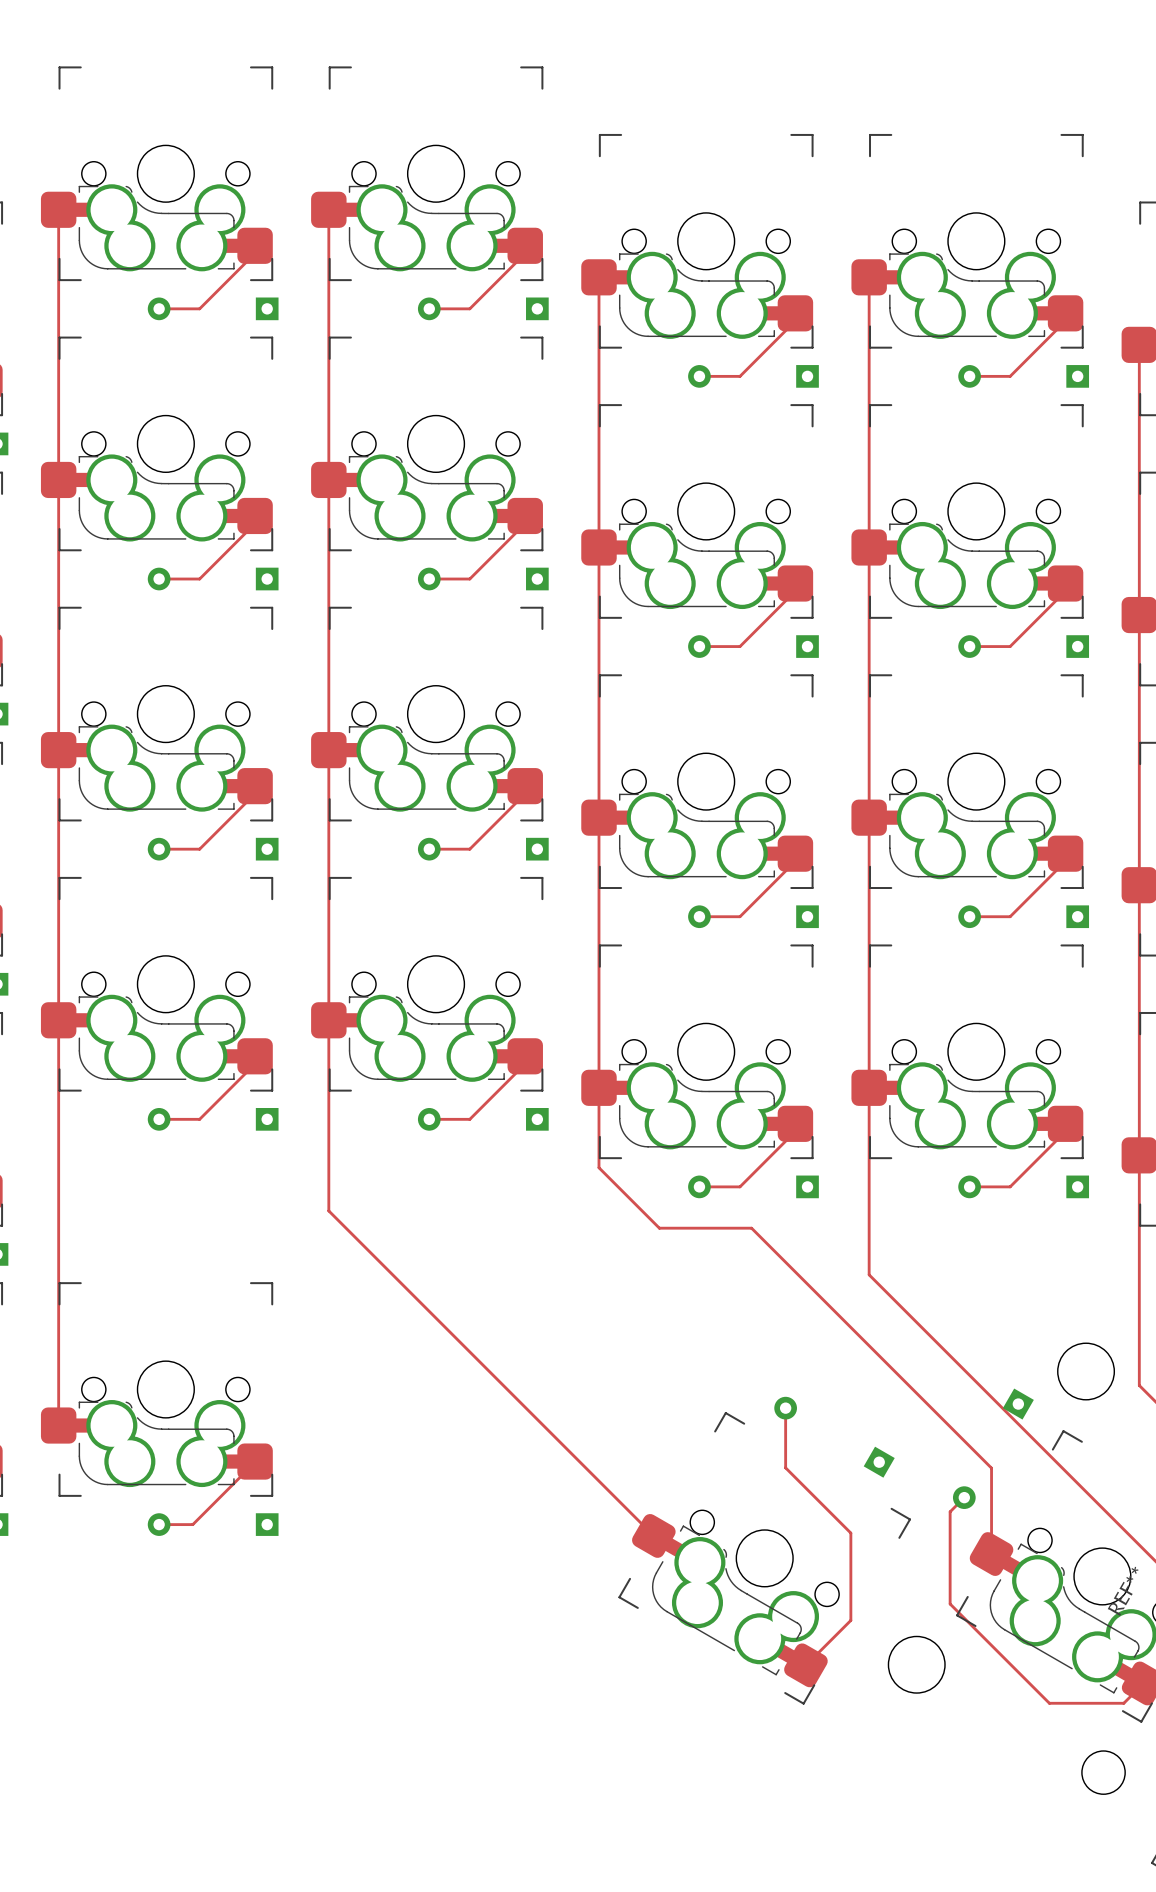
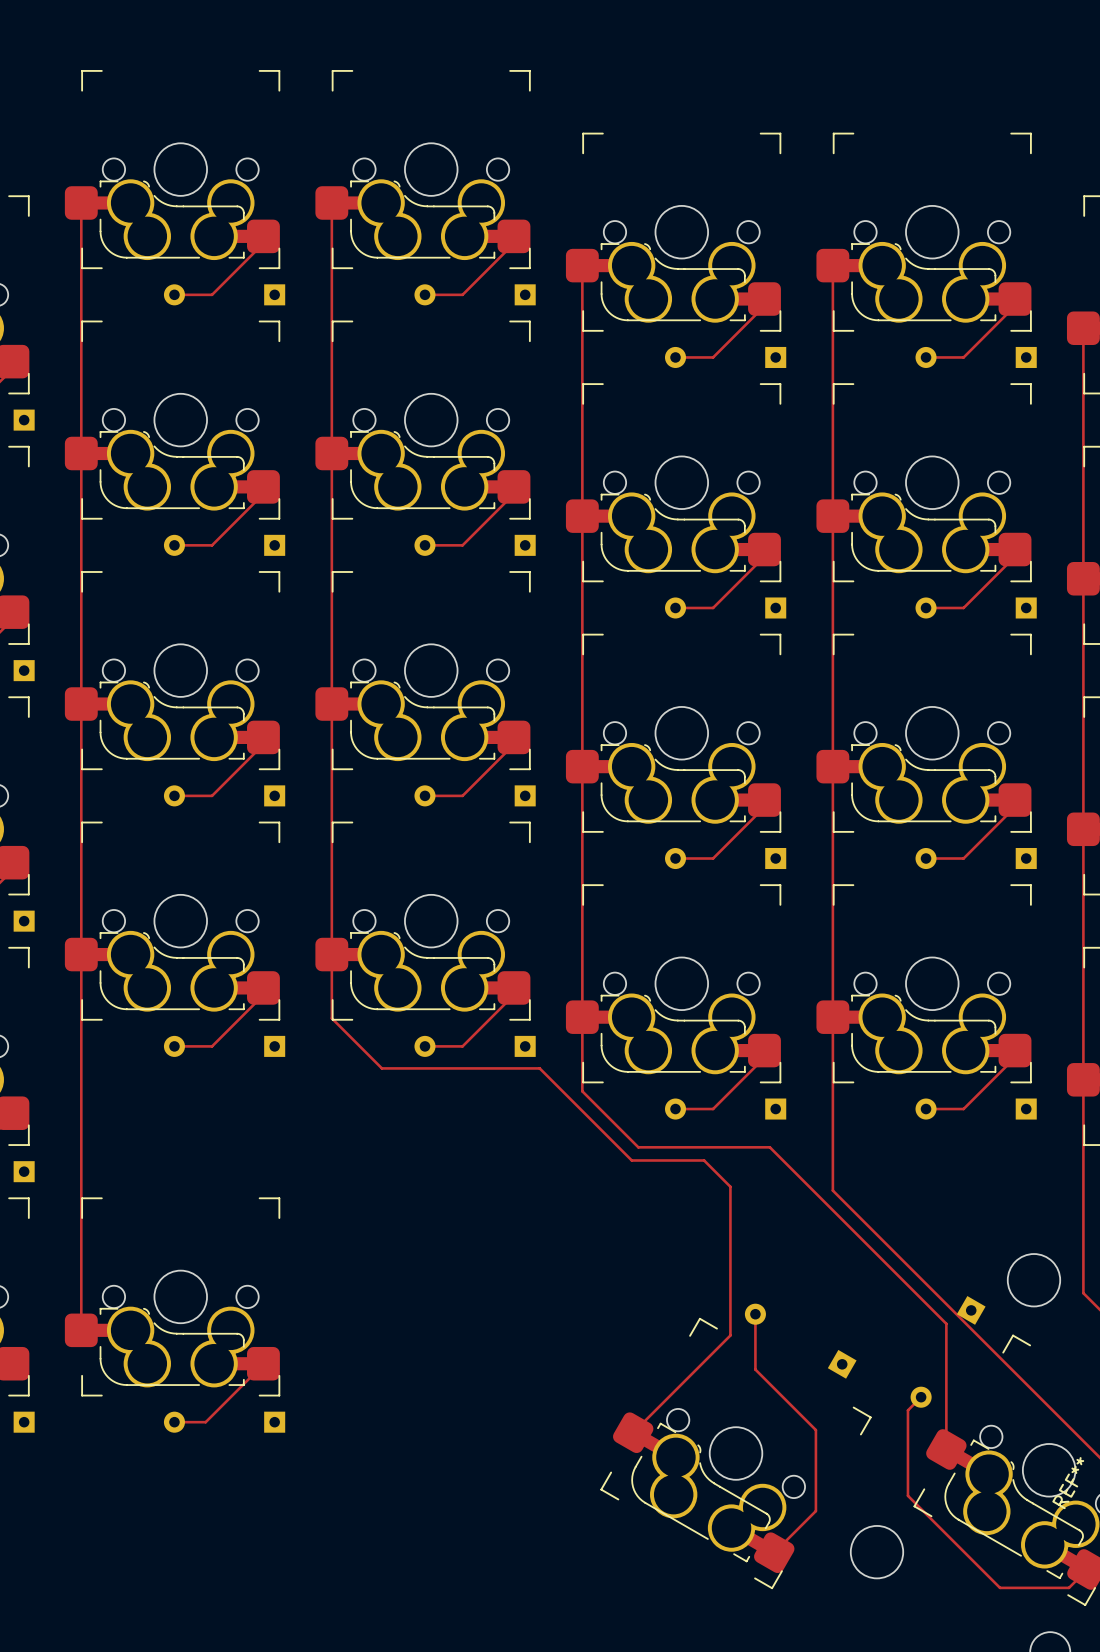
track: (328, 1089) (328, 1210) (653, 1535) -> (331, 1018) (381, 1068) (539, 1068) (631, 1160) (704, 1160) (730, 1186) (730, 1335) (633, 1432)
track: (751, 1228) (991, 1468) -> (723, 1147) (769, 1147) (946, 1323) (946, 1369)

